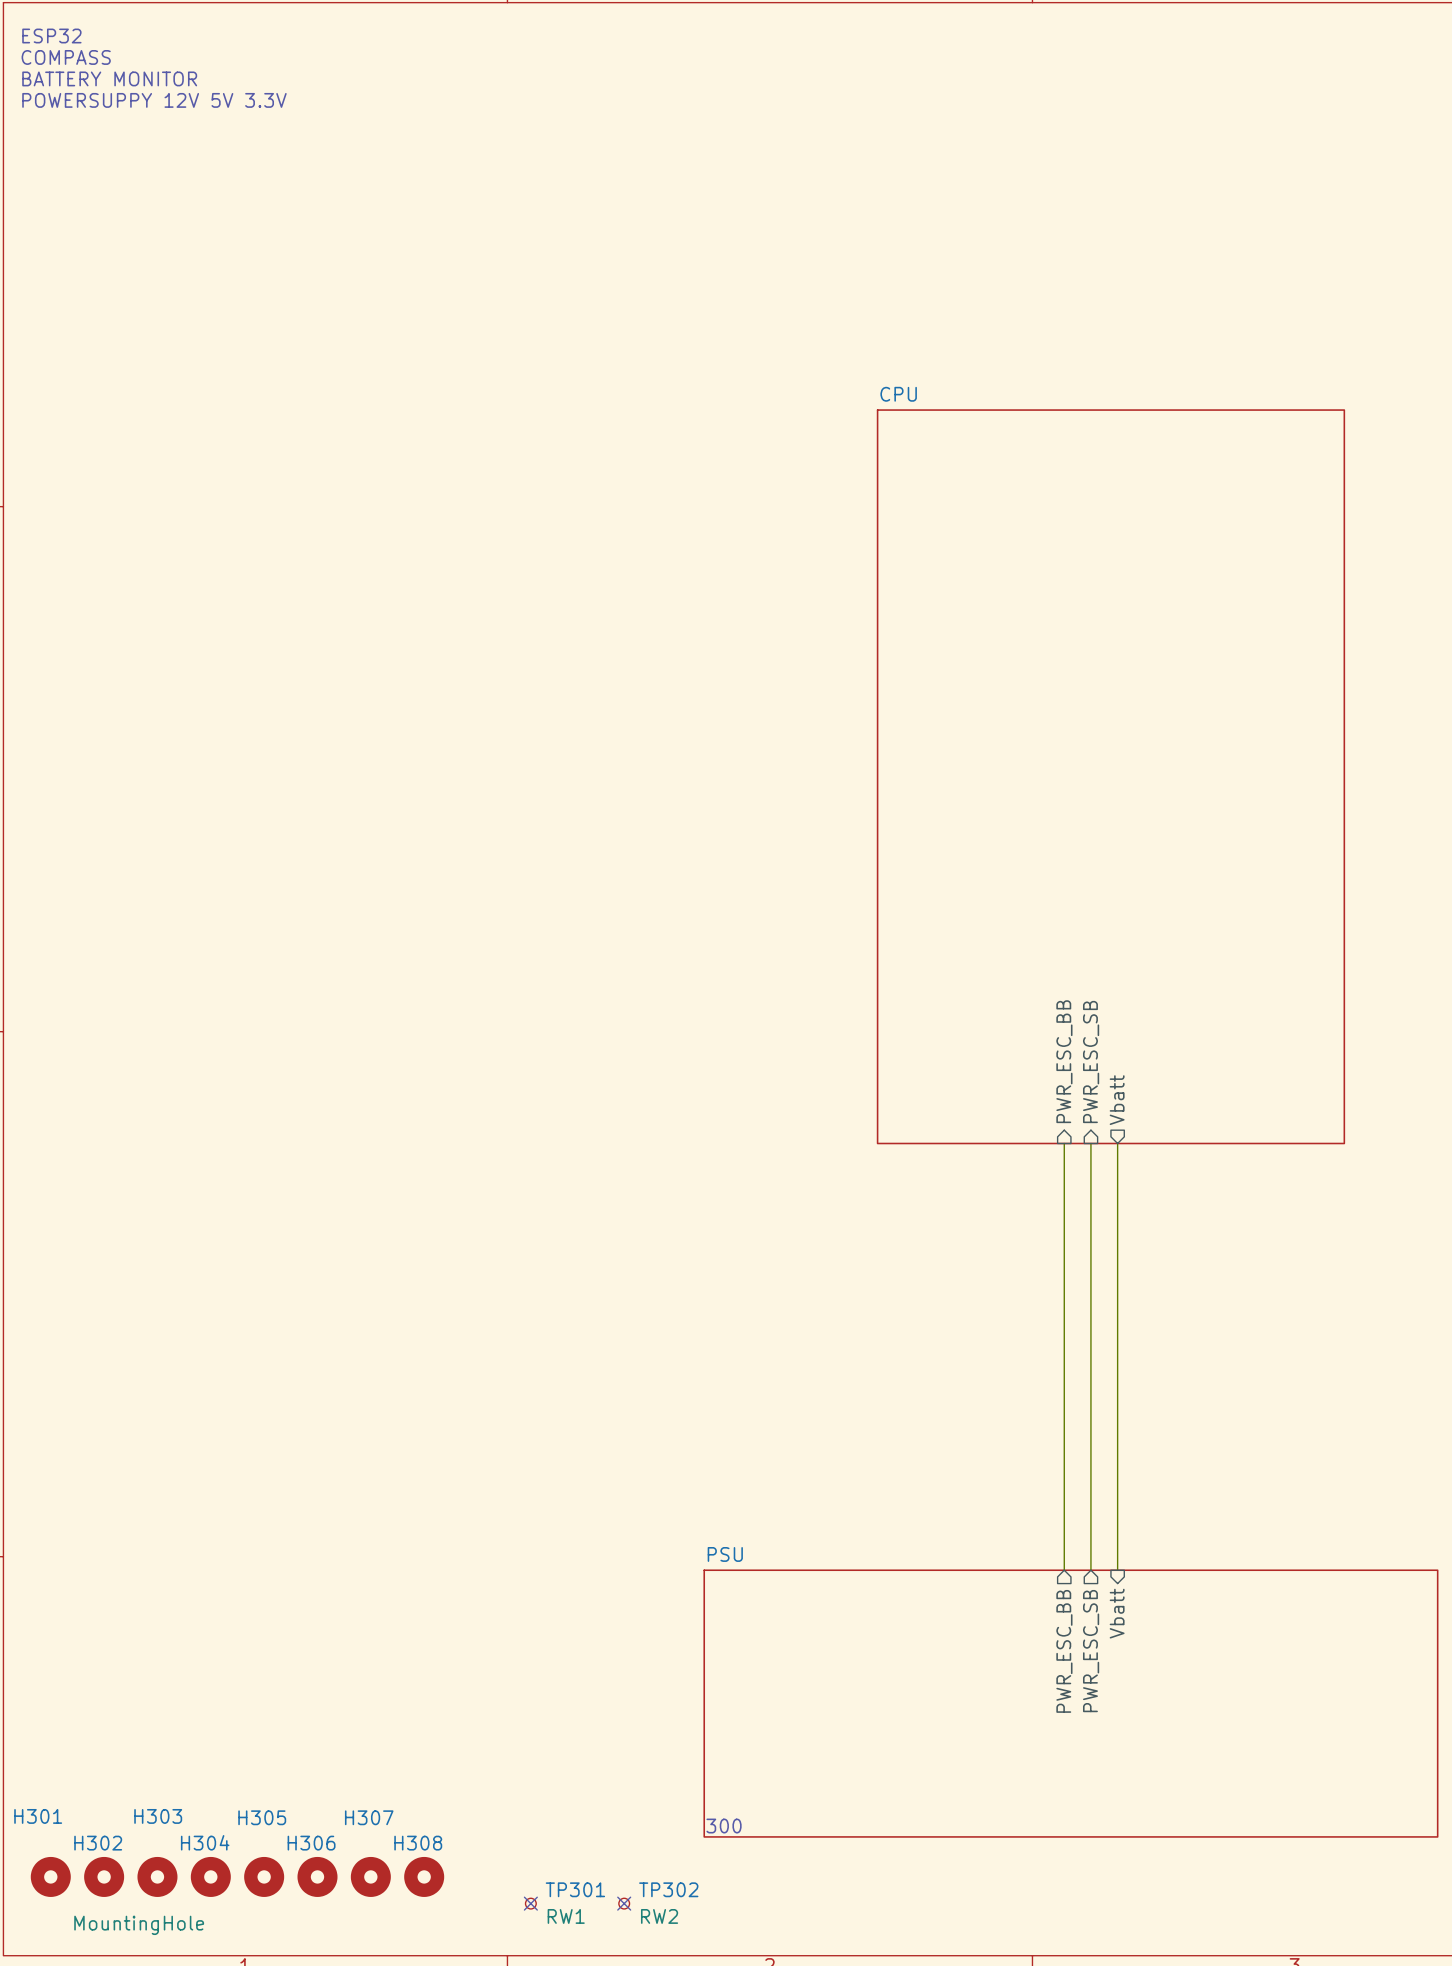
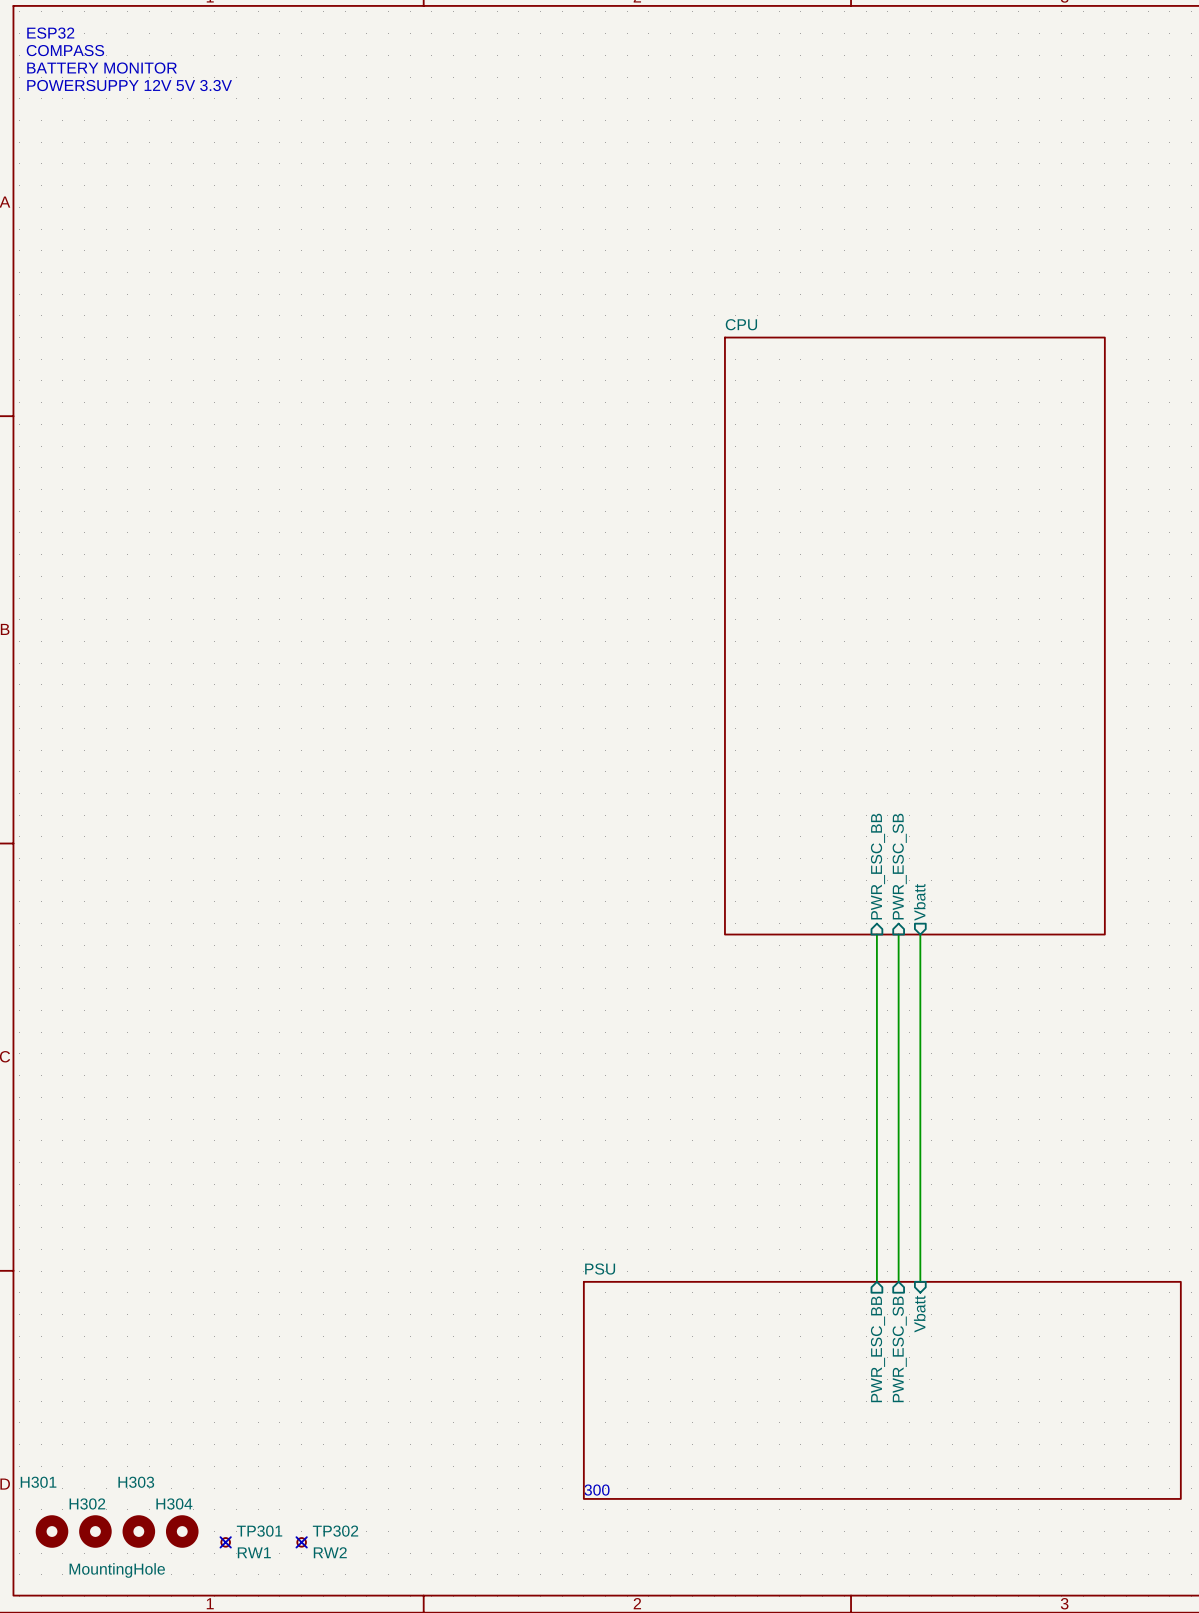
H305: (264, 1876) -> none
H306: (317, 1876) -> none
H307: (370, 1876) -> none
H308: (424, 1876) -> none
no-connect mark: none -> (225, 1542)
no-connect mark: none -> (301, 1542)
no-connect mark: (530, 1903) -> none
TP301 position: (530, 1903) -> (225, 1542)
no-connect mark: (624, 1903) -> none
TP302 position: (624, 1903) -> (301, 1542)

